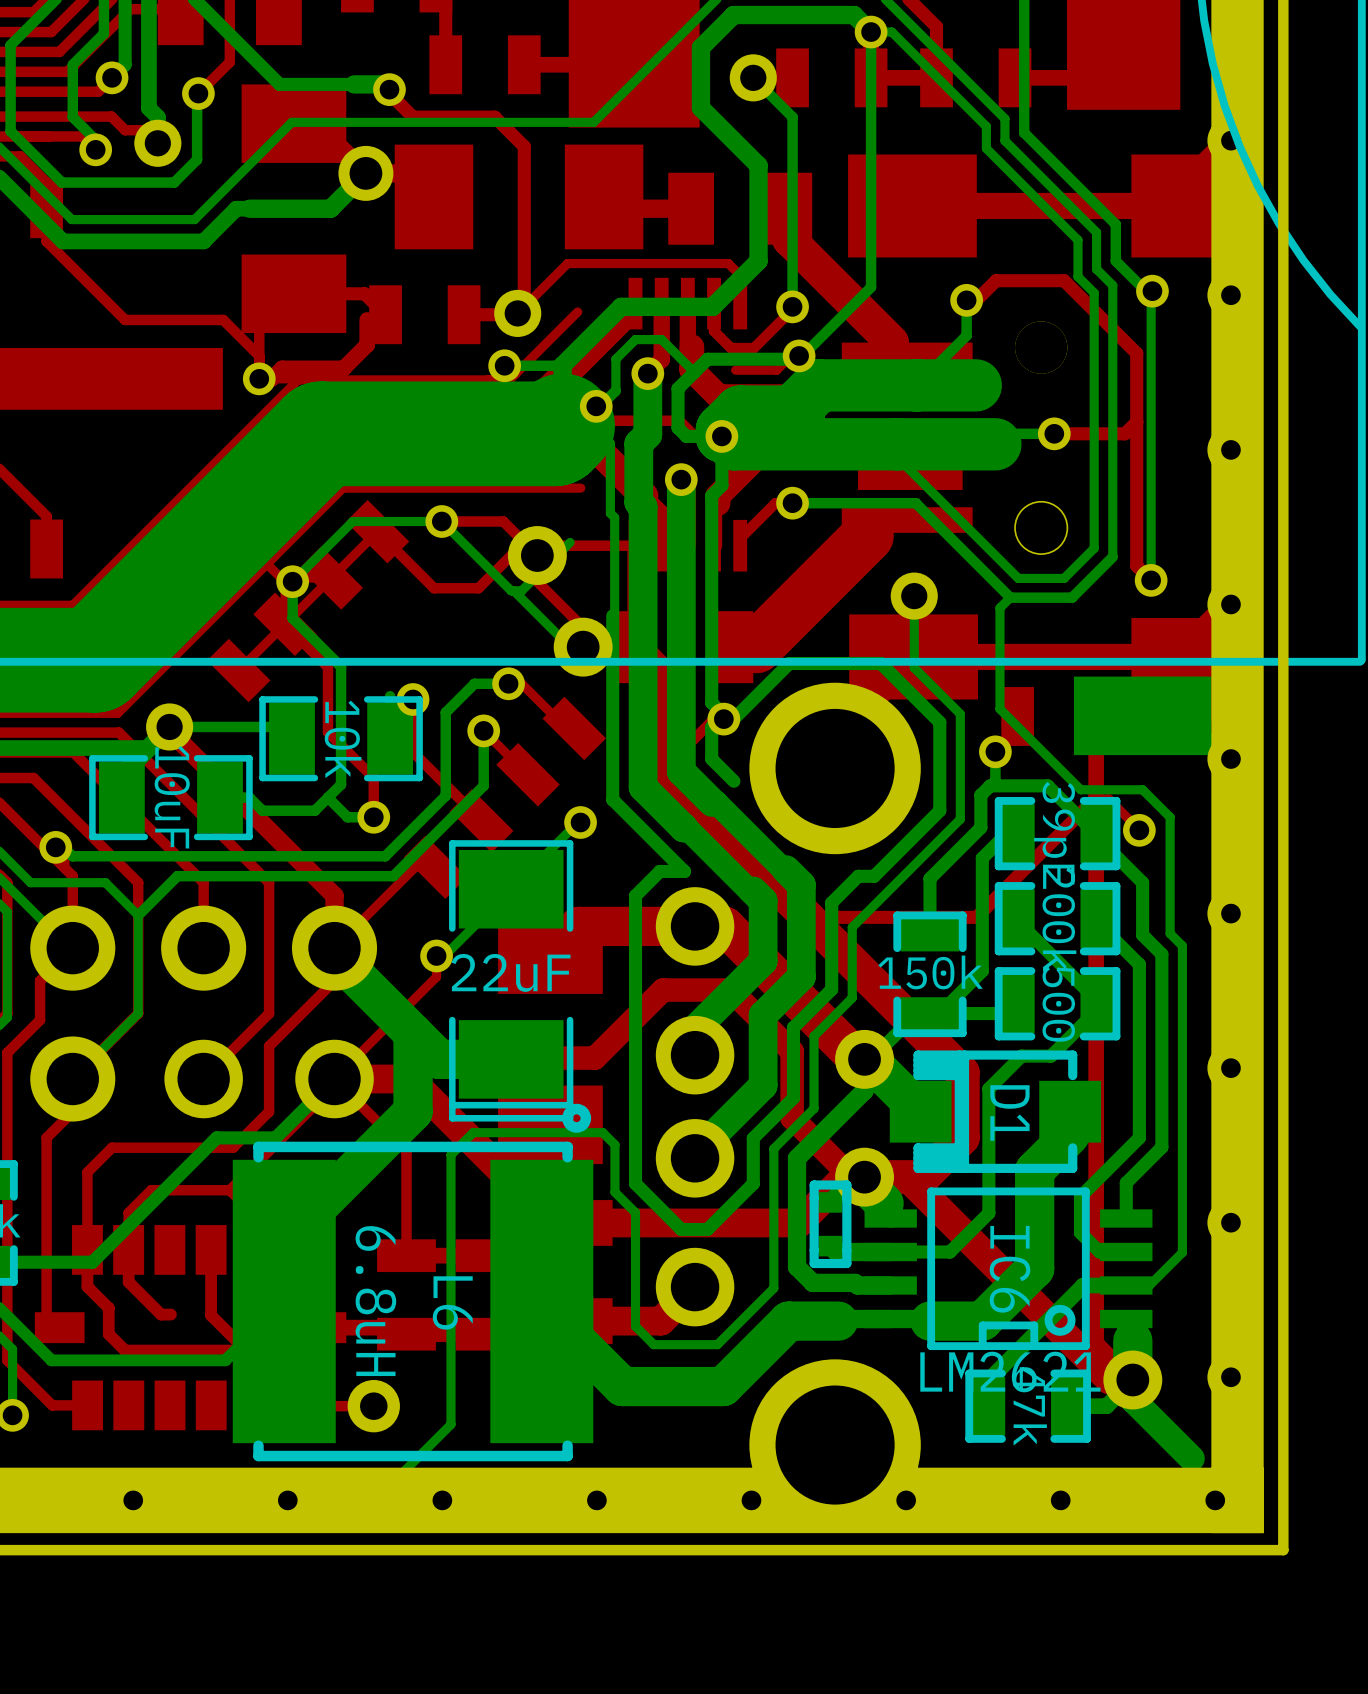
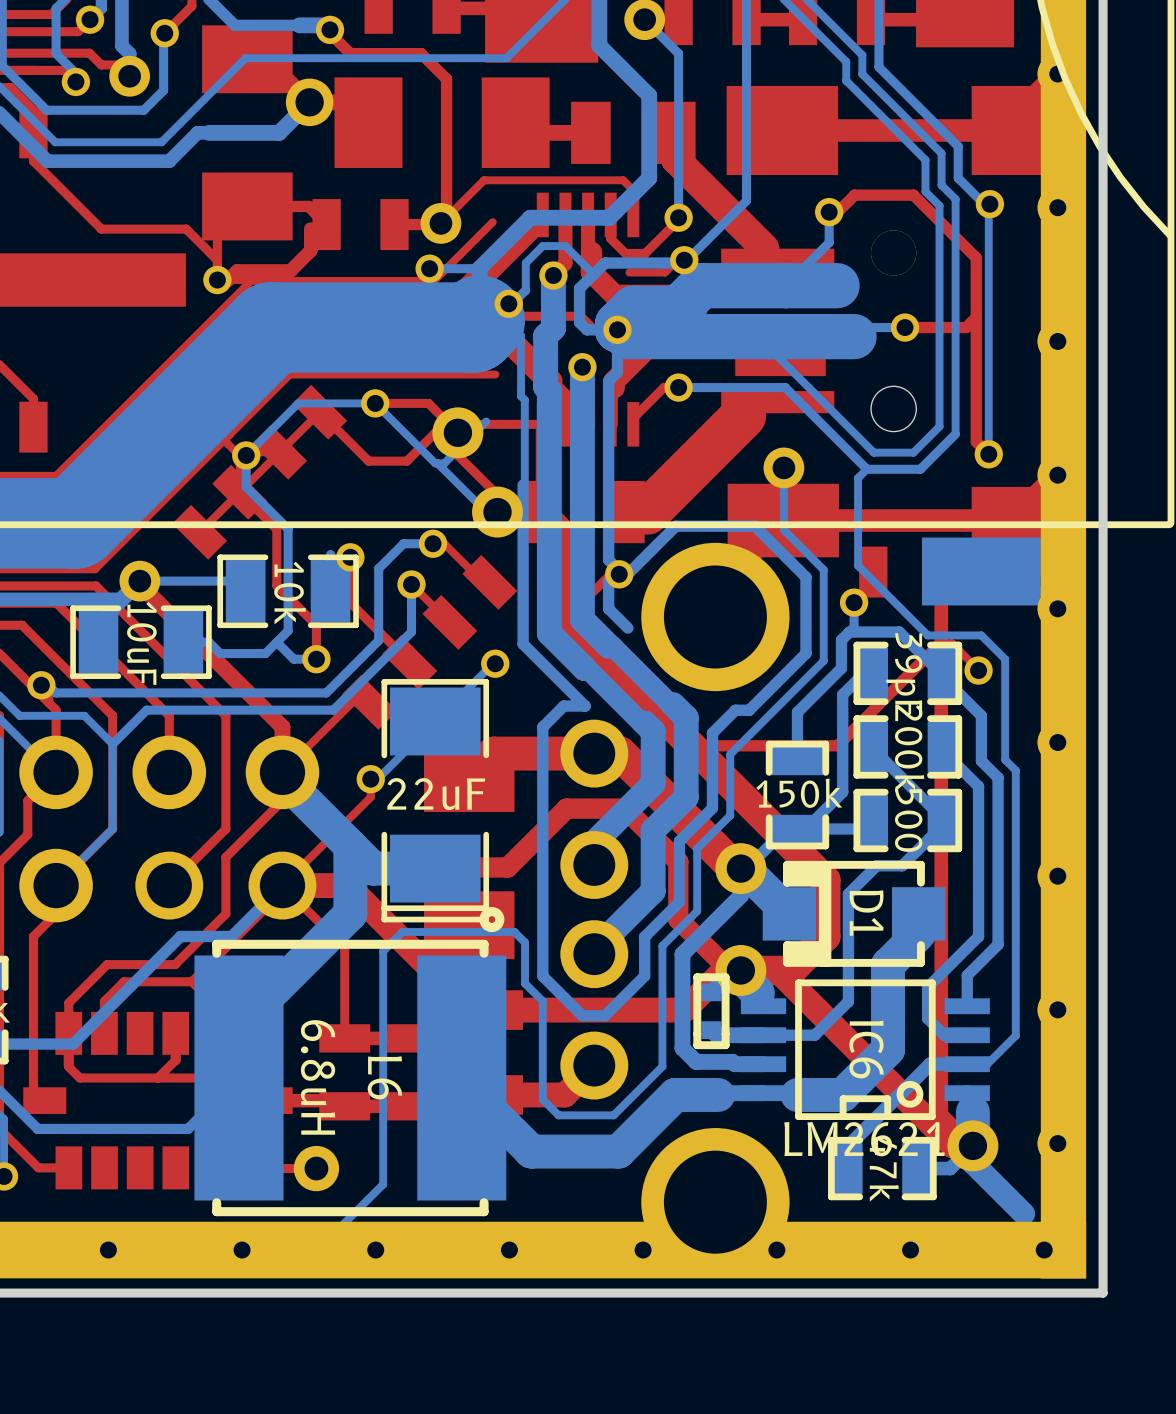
top track: (233, 1147) (112, 1147) (87, 1172) (87, 1214) -> (194, 945) (175, 964) (107, 964) (68, 1003)
top track: (128, 1249) (128, 1282) (161, 1314) (170, 1314) -> none
top track: (211, 1280) (211, 1315) (246, 1350) -> (175, 1060) (157, 1078)
top track: (87, 1286) (108, 1308) (108, 1334) (125, 1350) (291, 1350) (314, 1327) (321, 1327) -> (68, 1065) (79, 1078) (248, 1078) (271, 1100)

